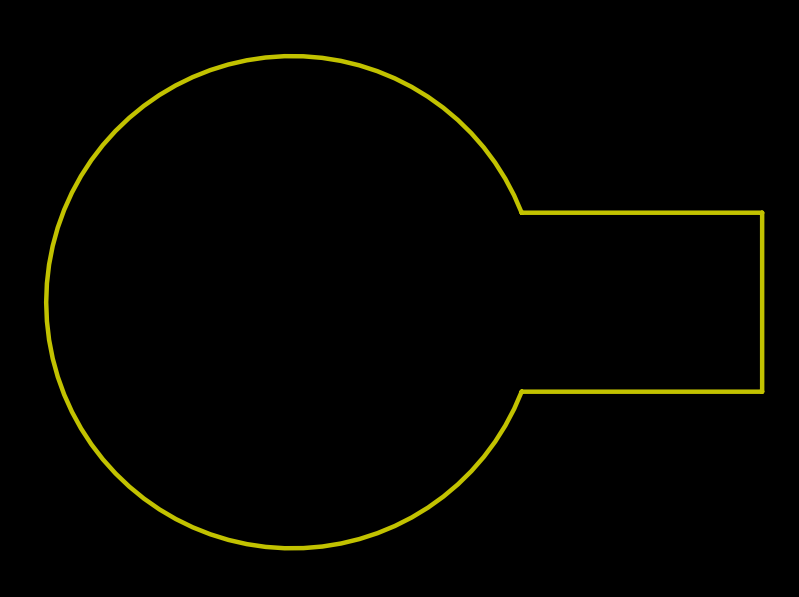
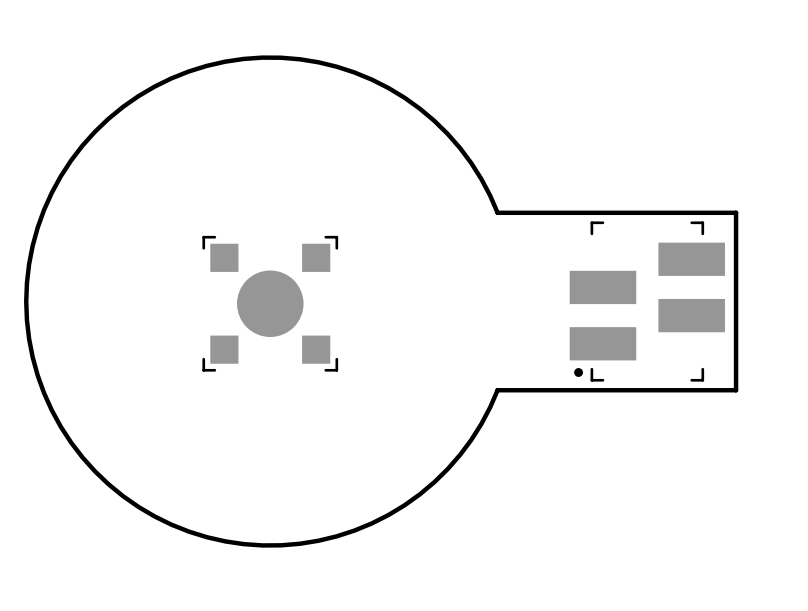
part: none -> (647, 301)
part: none -> (270, 303)

